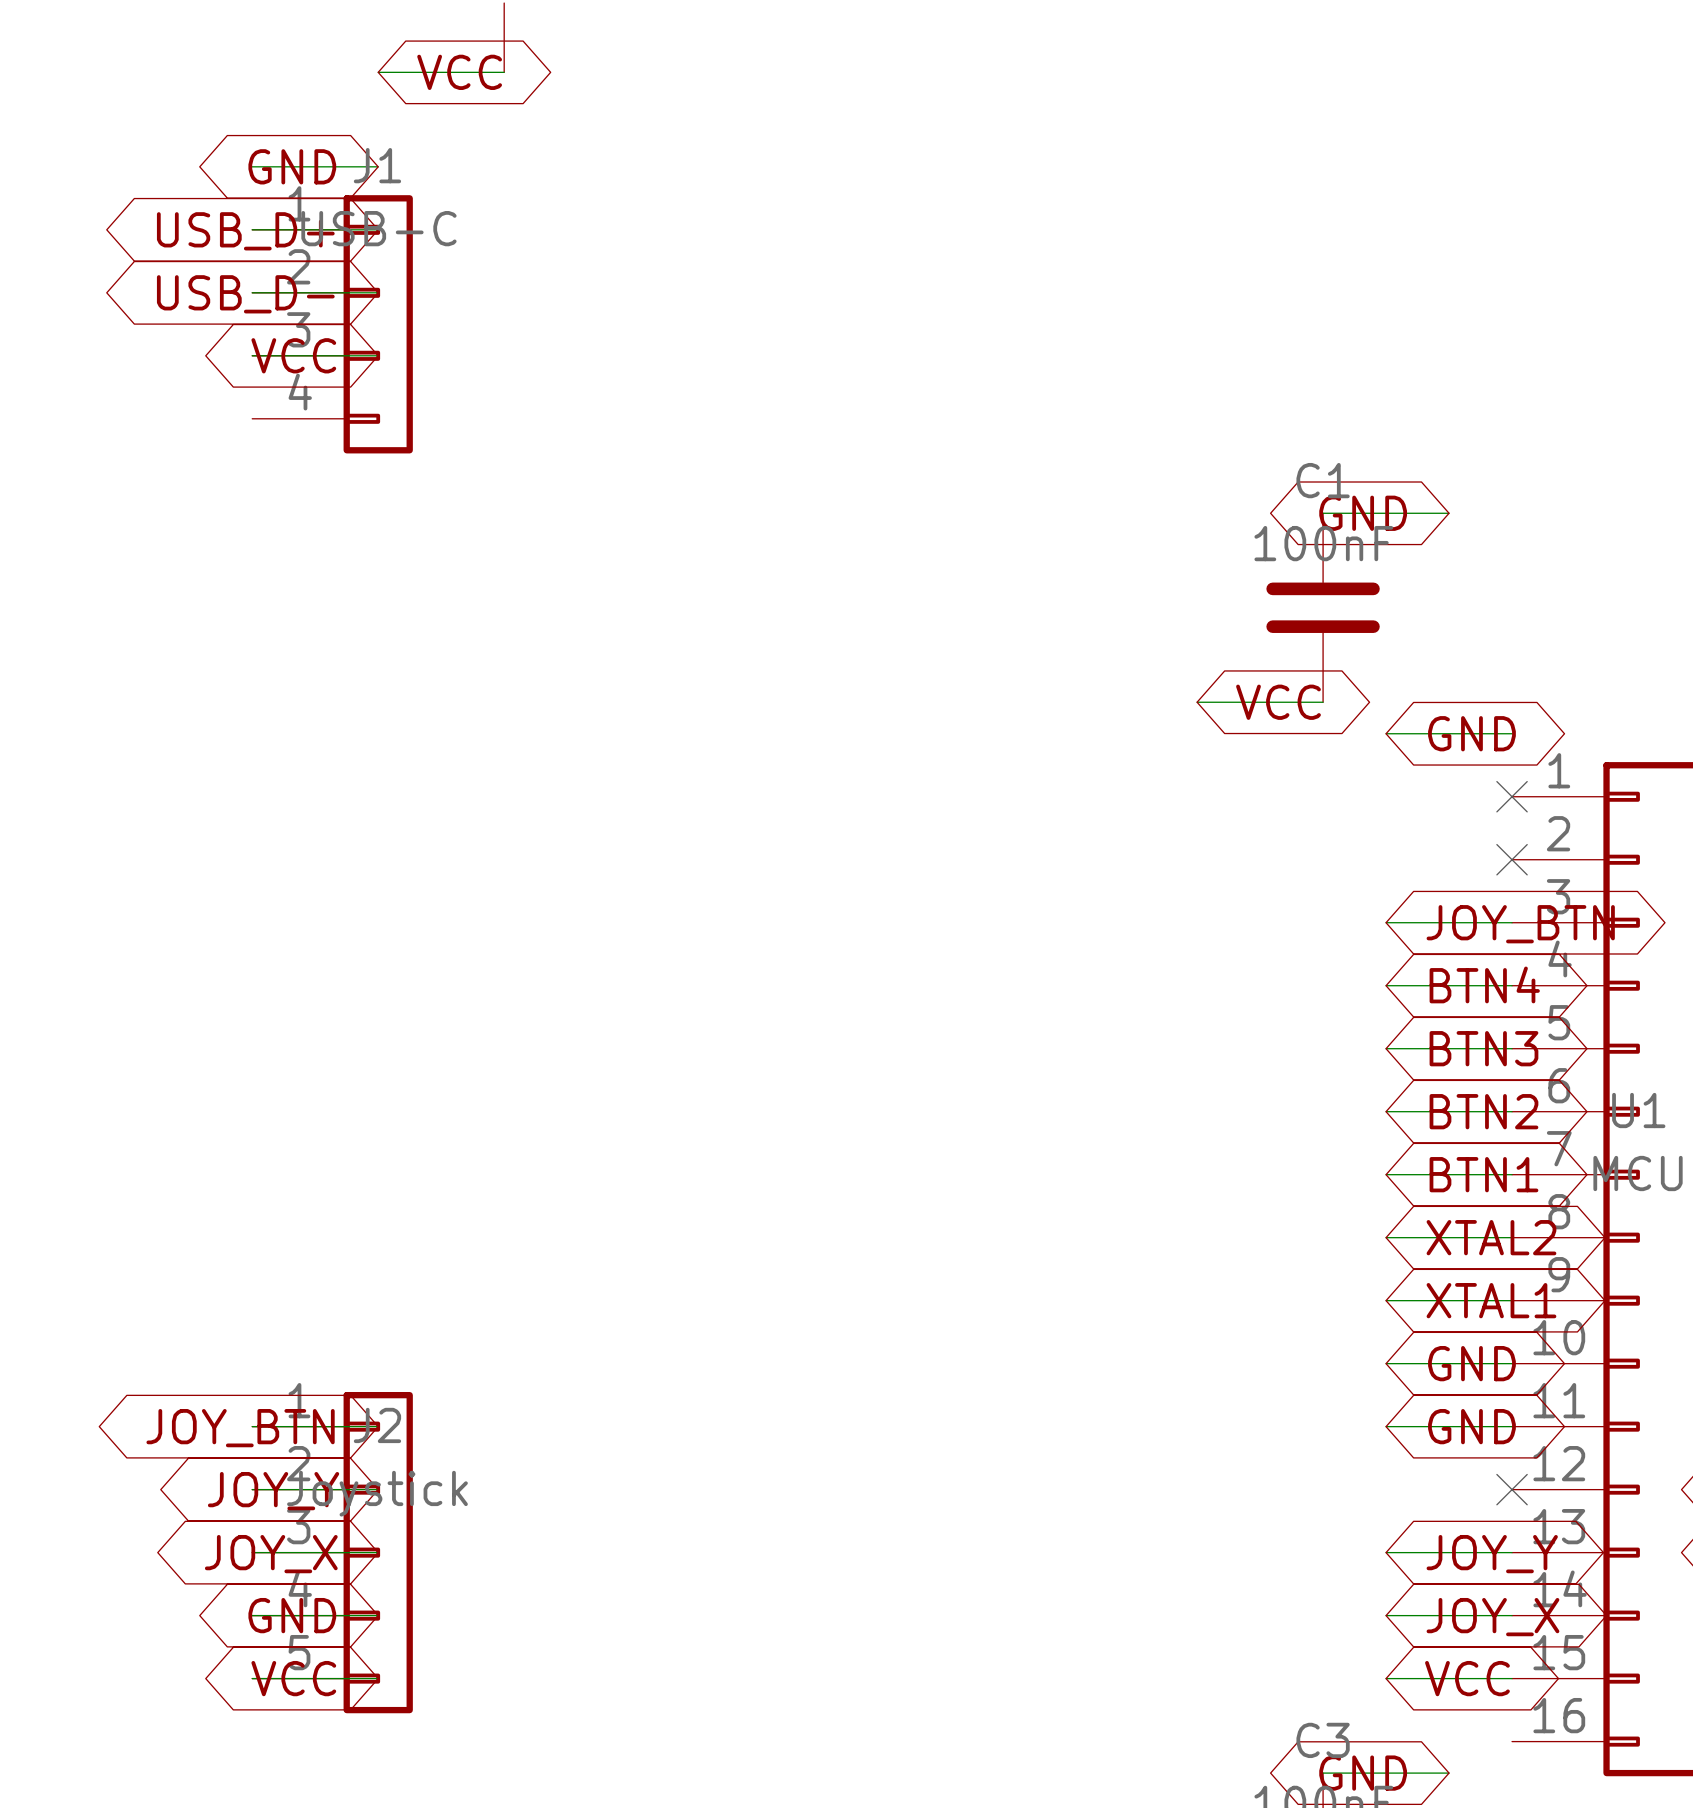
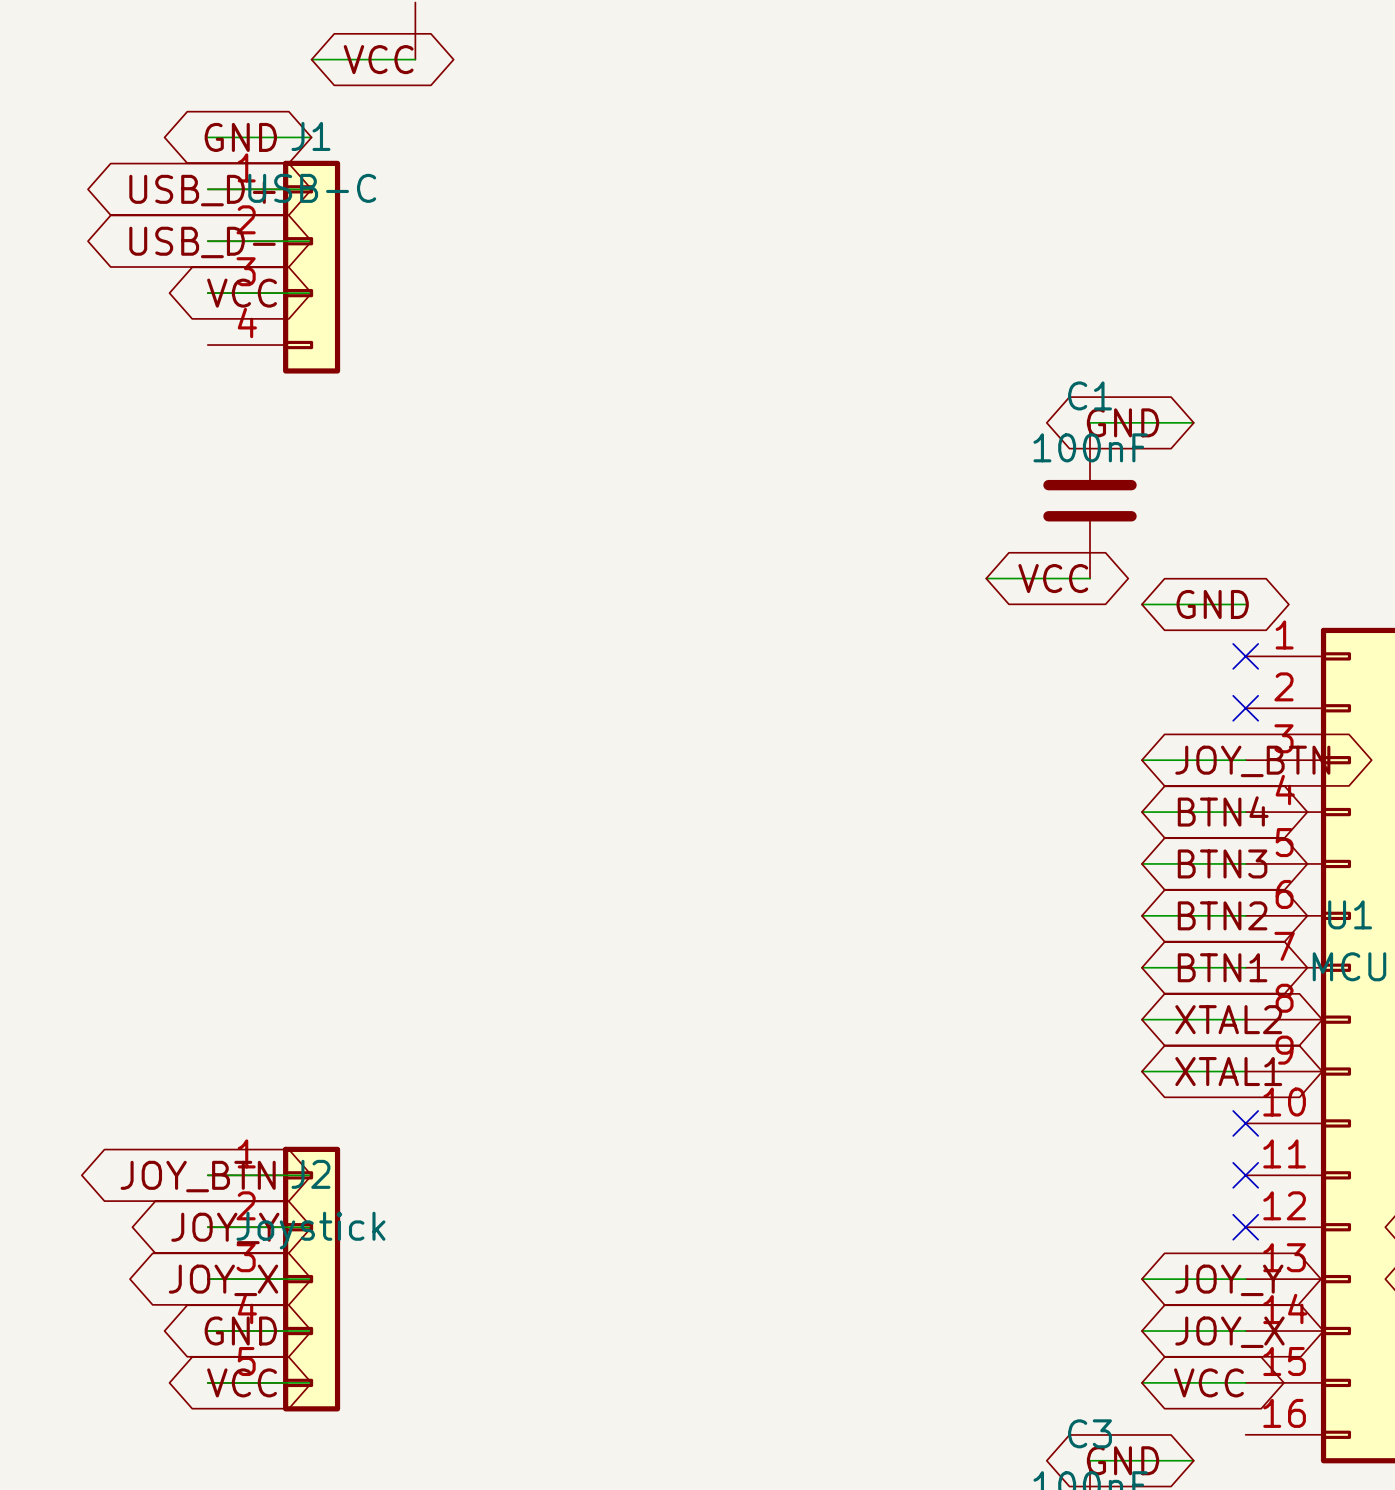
wire: (1386, 1363) (1512, 1363) -> none
global label: GND (1471, 1363) -> none
no-connect mark: none -> (1245, 1123)
wire: (1386, 1426) (1512, 1426) -> none
global label: GND (1471, 1426) -> none
no-connect mark: none -> (1245, 1175)

